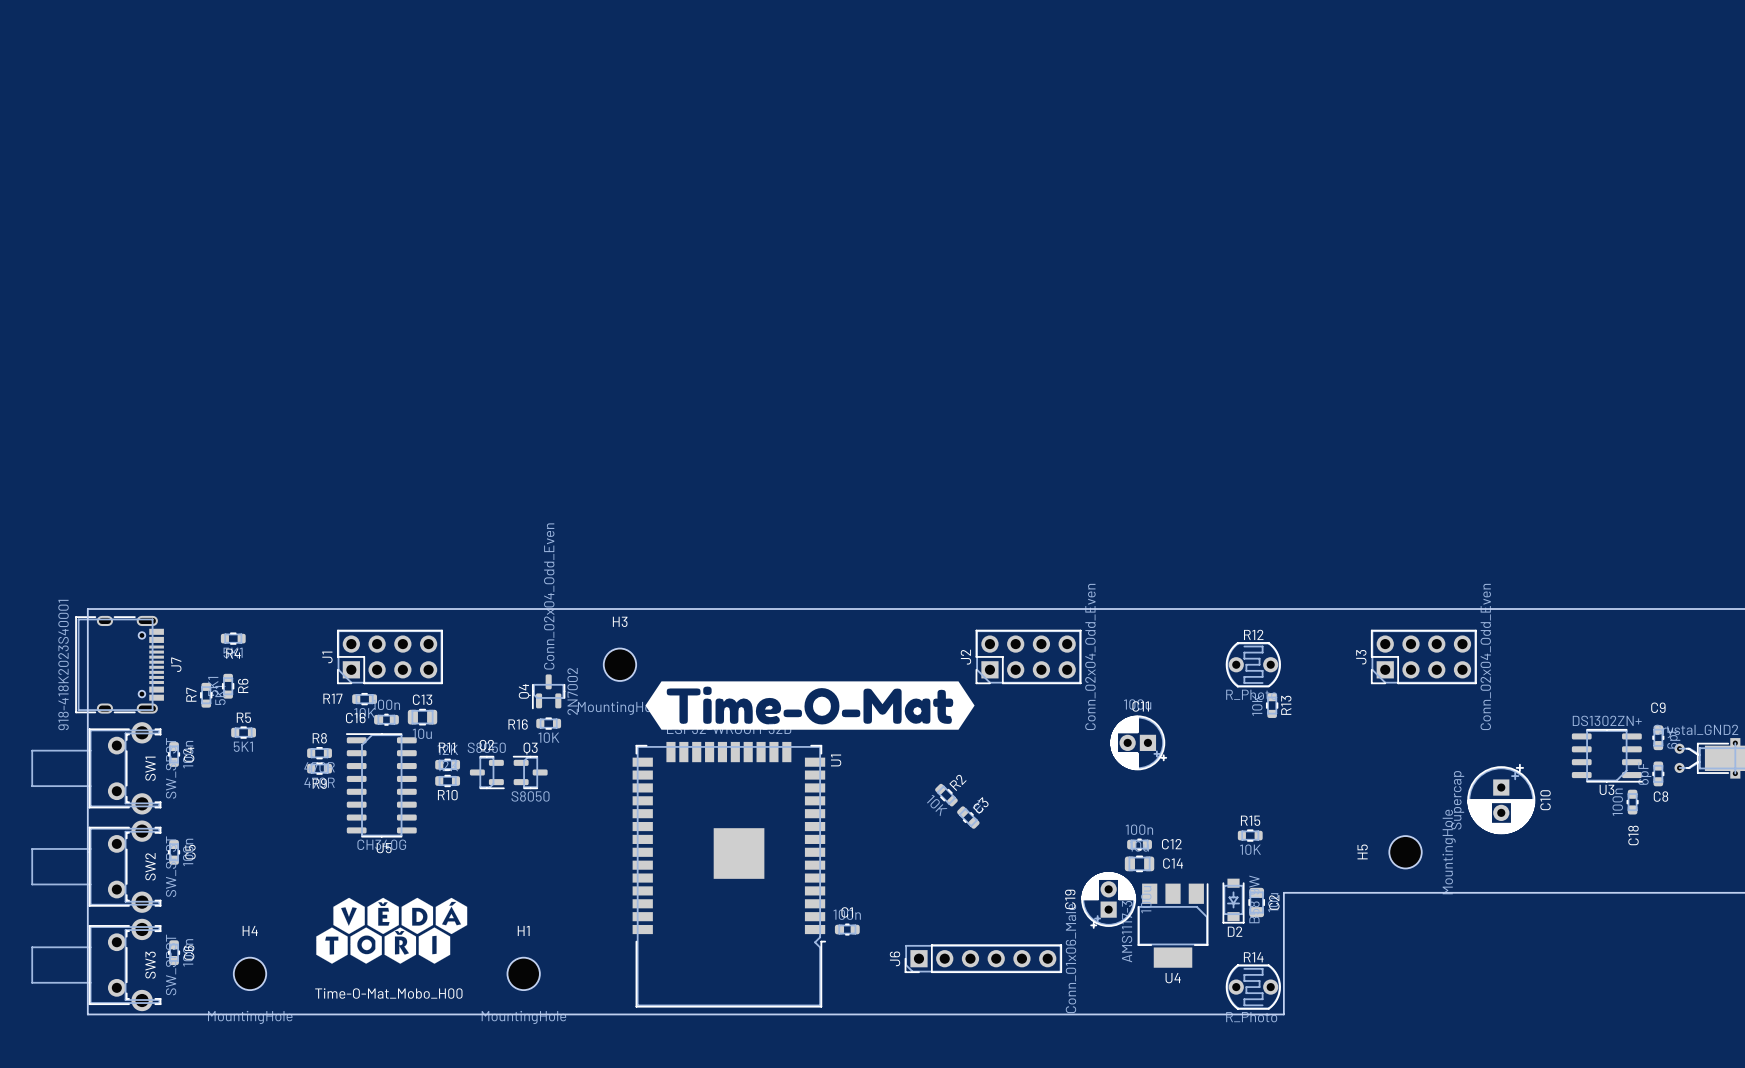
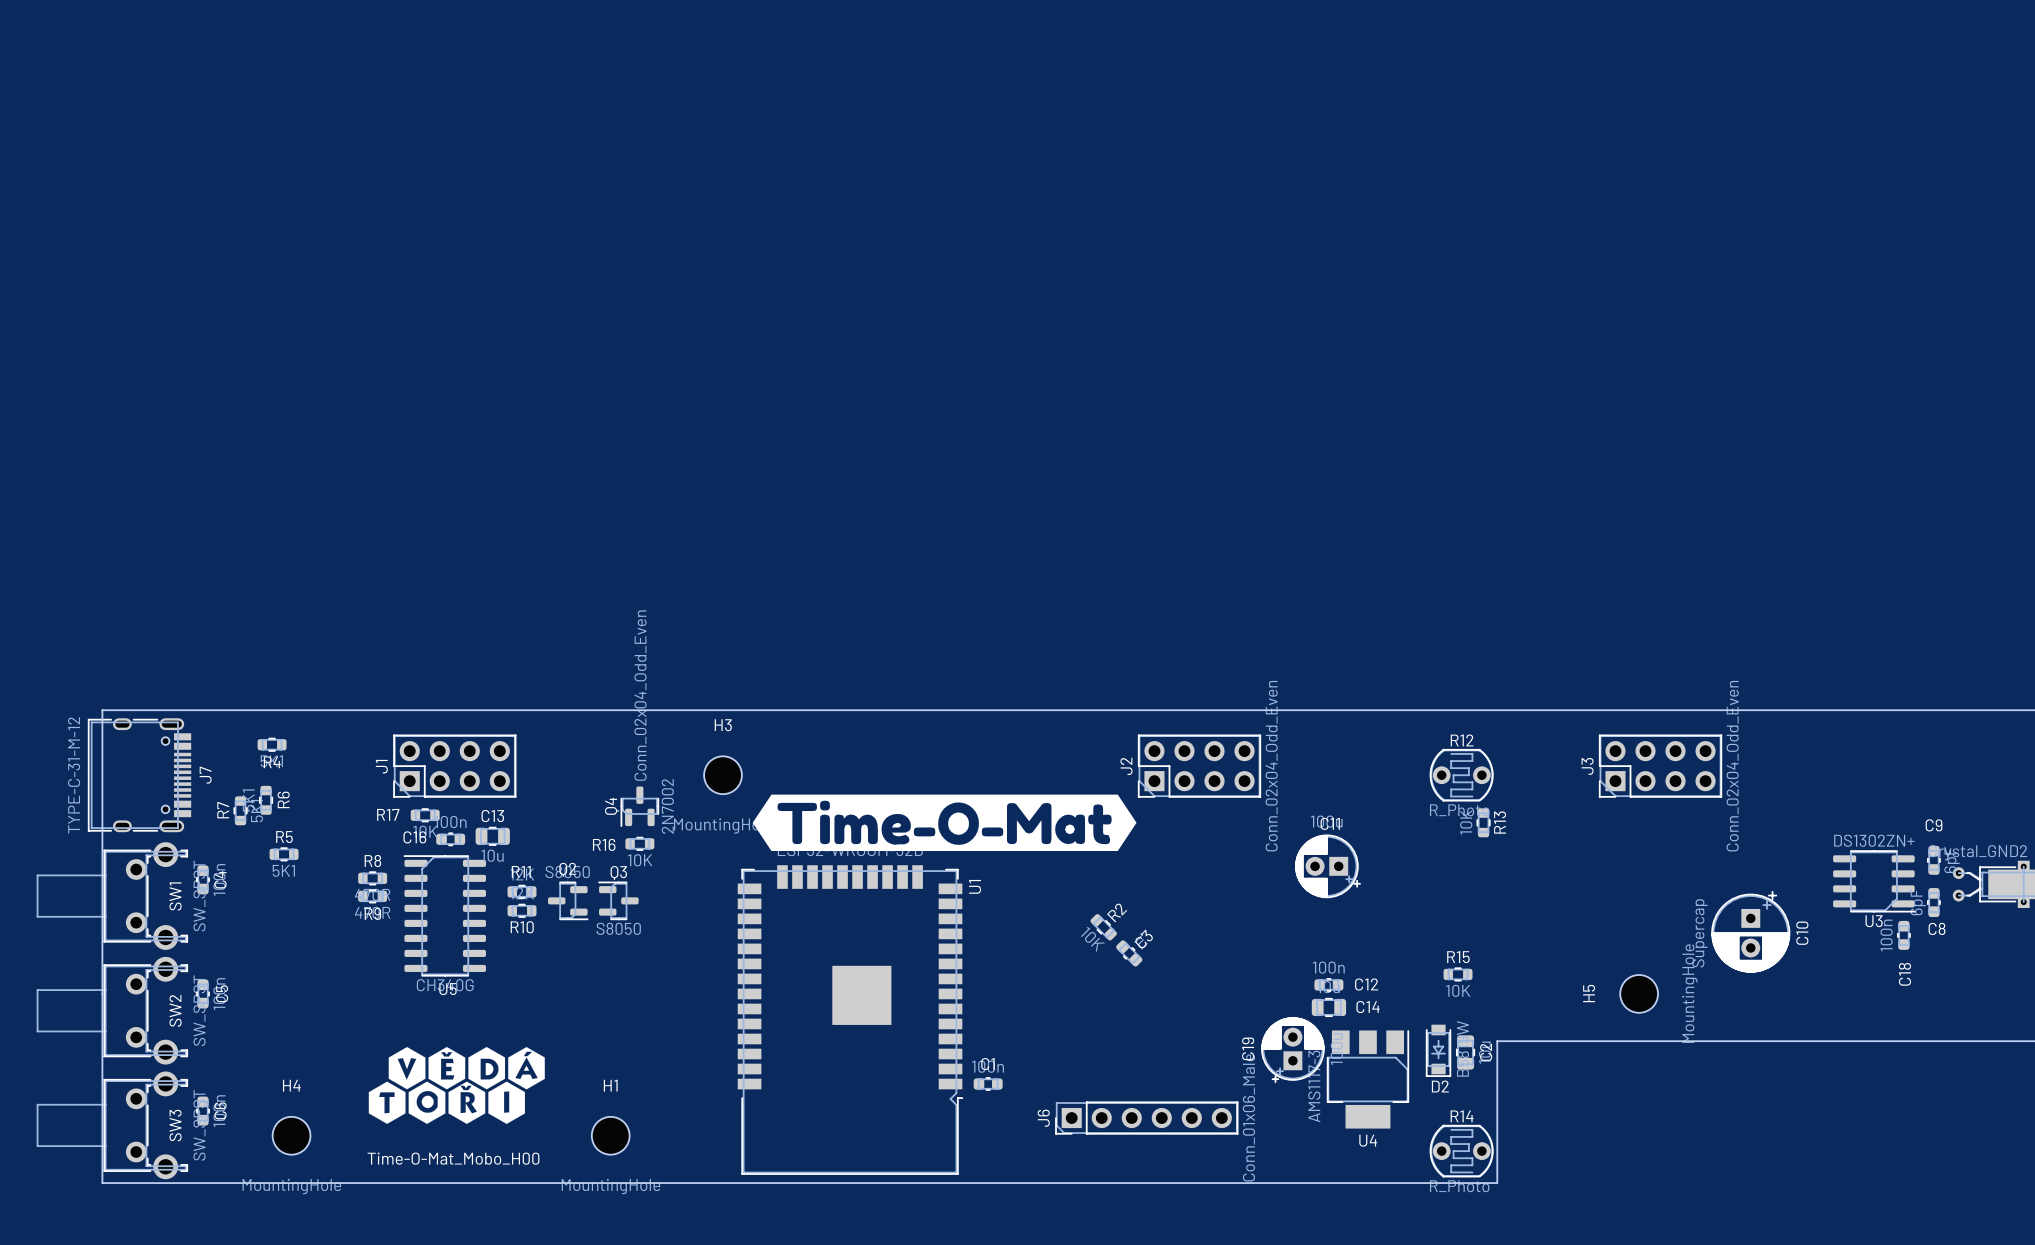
J7 value: 918-418K2023S40001 (63, 665) -> TYPE-C-31-M-12 (74, 775)

